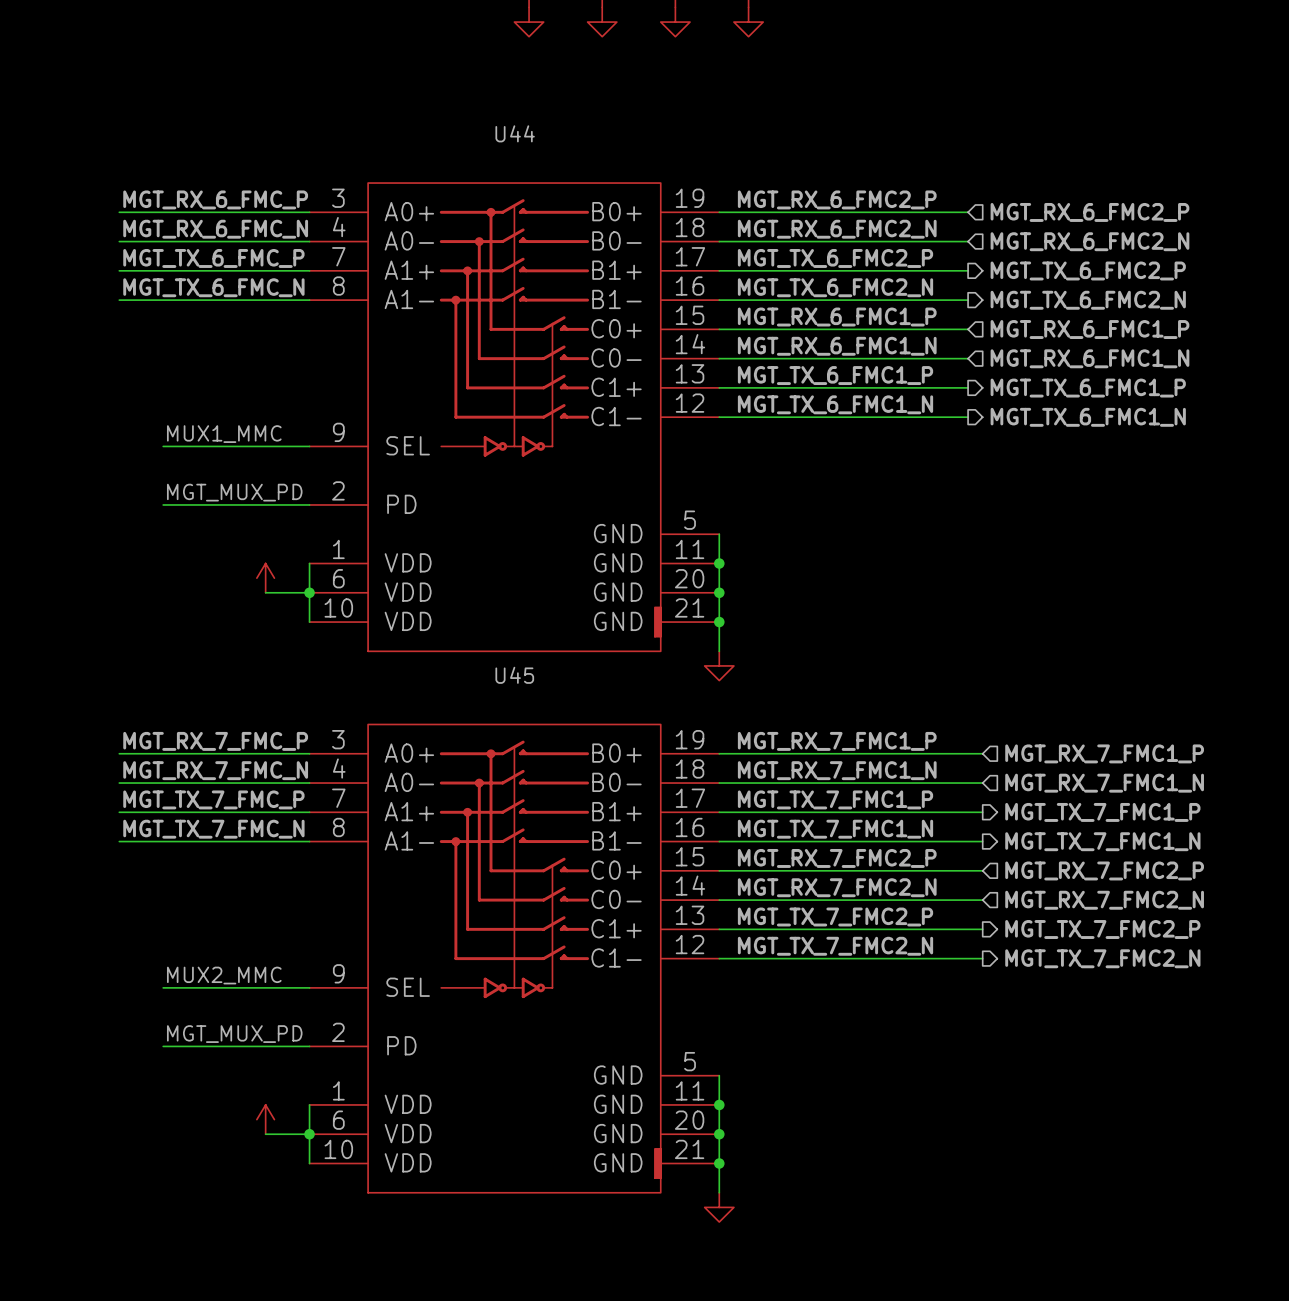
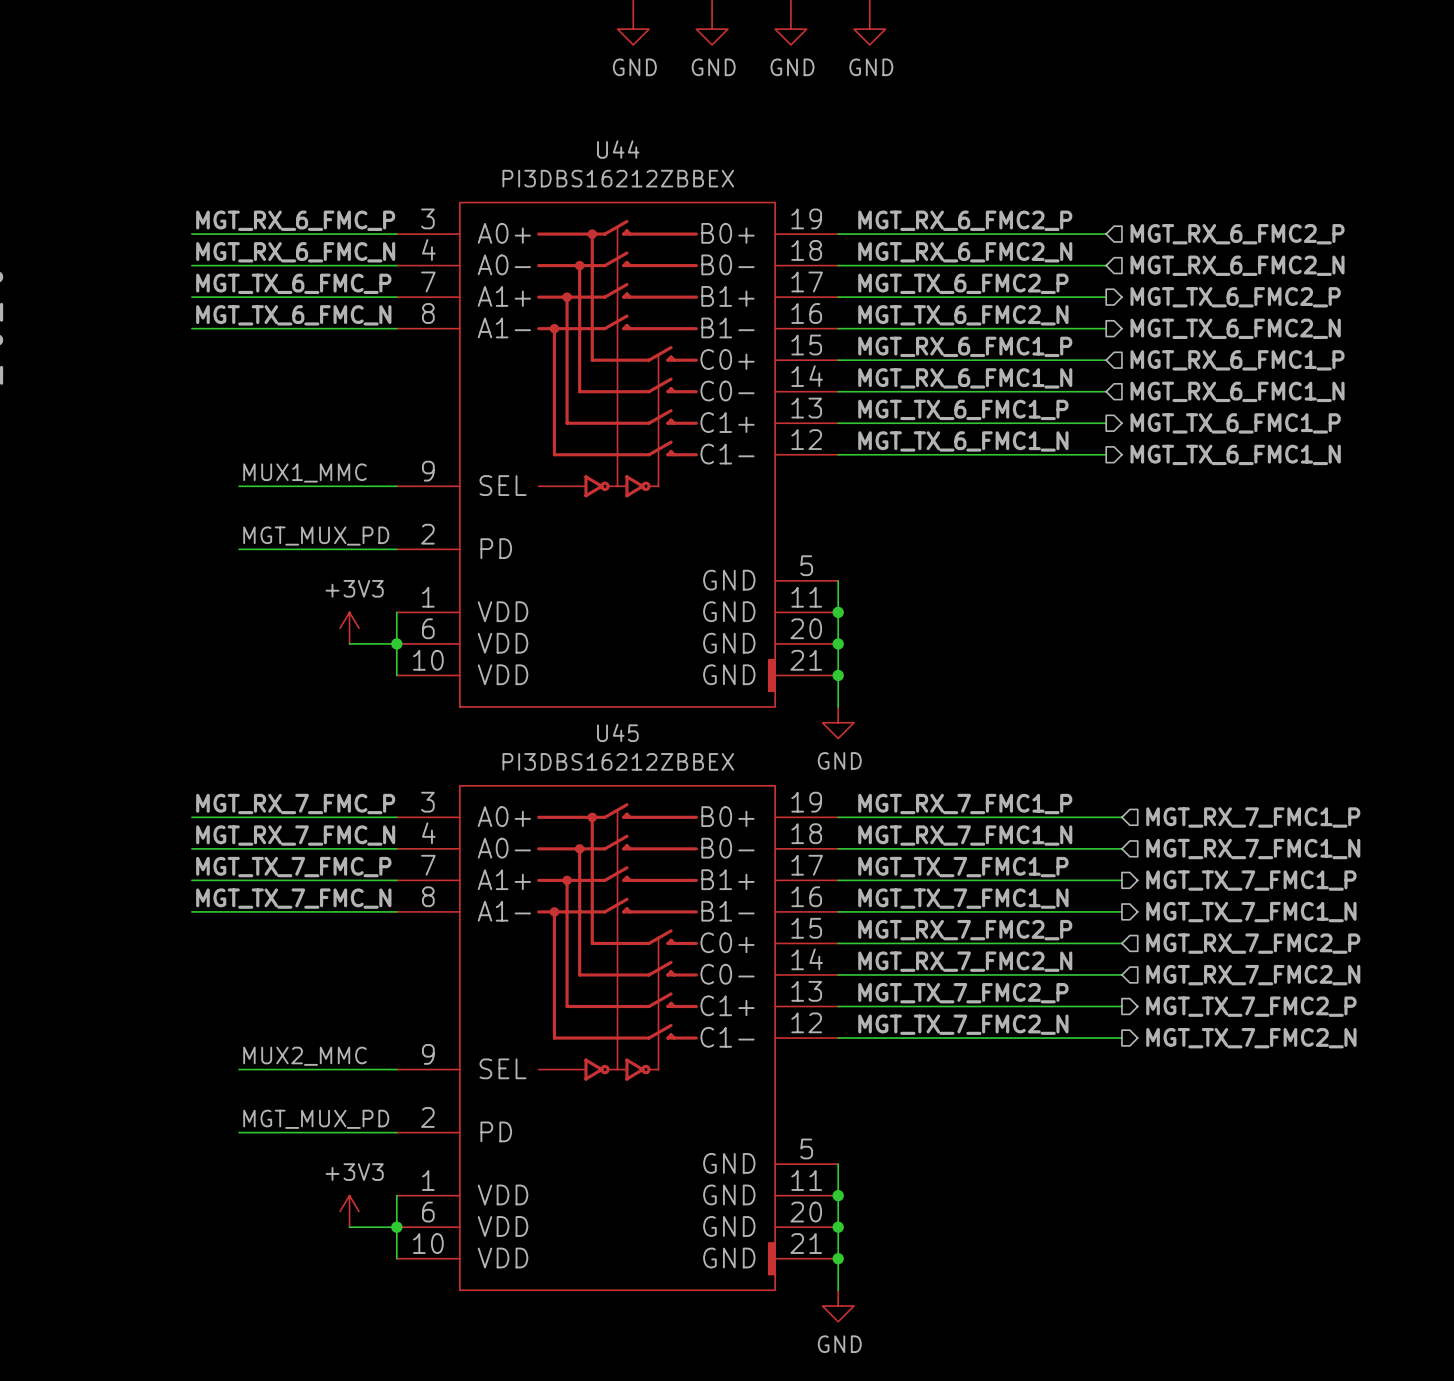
power symbol text: none -> GND (634, 67)
power symbol text: none -> GND (713, 67)
power symbol text: none -> GND (792, 67)
power symbol text: none -> GND (871, 67)
U44 value: none -> PI3DBS16212ZBBEX (618, 178)
power symbol text: none -> +3V3 (354, 588)
power symbol text: none -> GND (839, 760)
U45 value: none -> PI3DBS16212ZBBEX (618, 761)
power symbol text: none -> +3V3 (354, 1172)
power symbol text: none -> GND (839, 1344)

